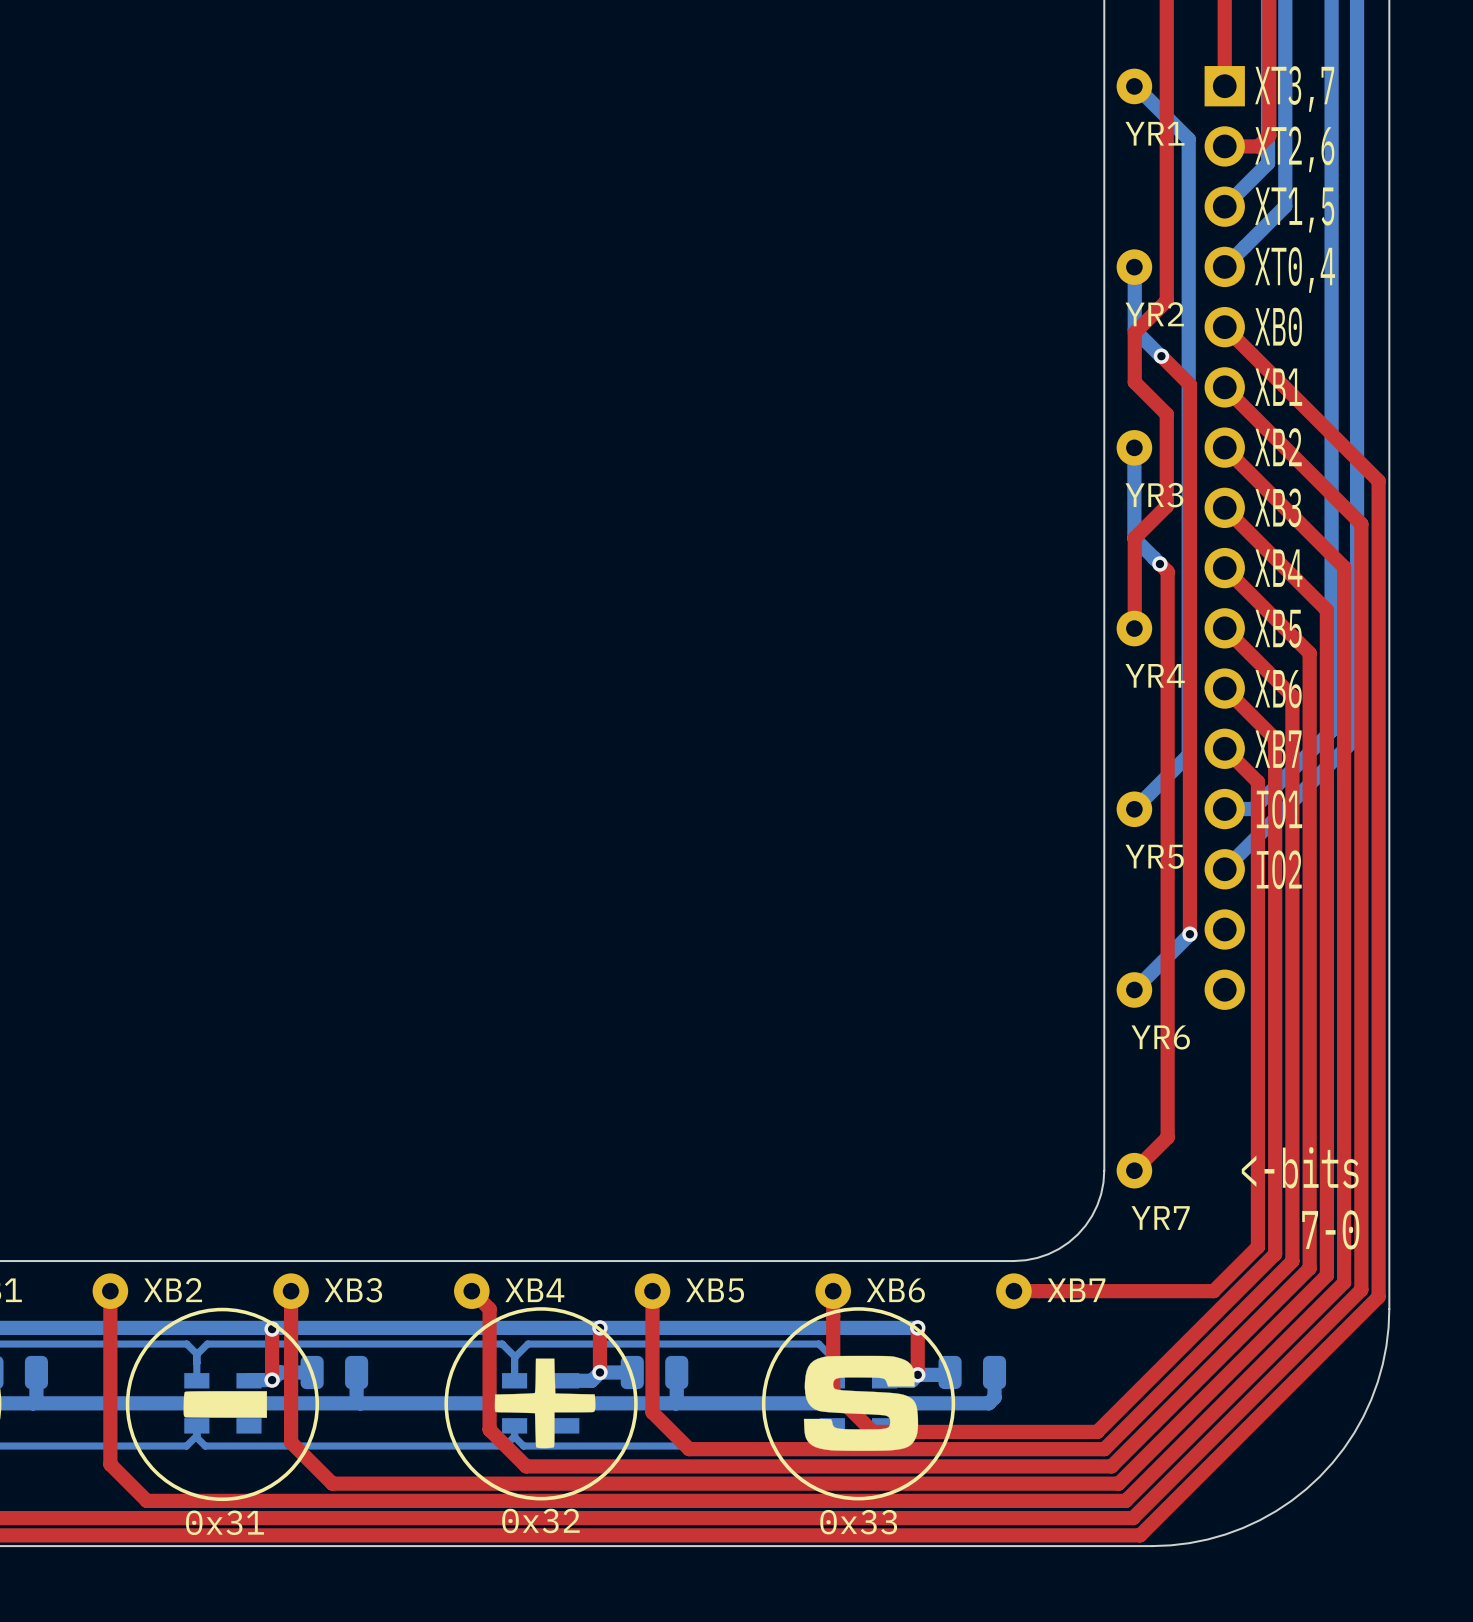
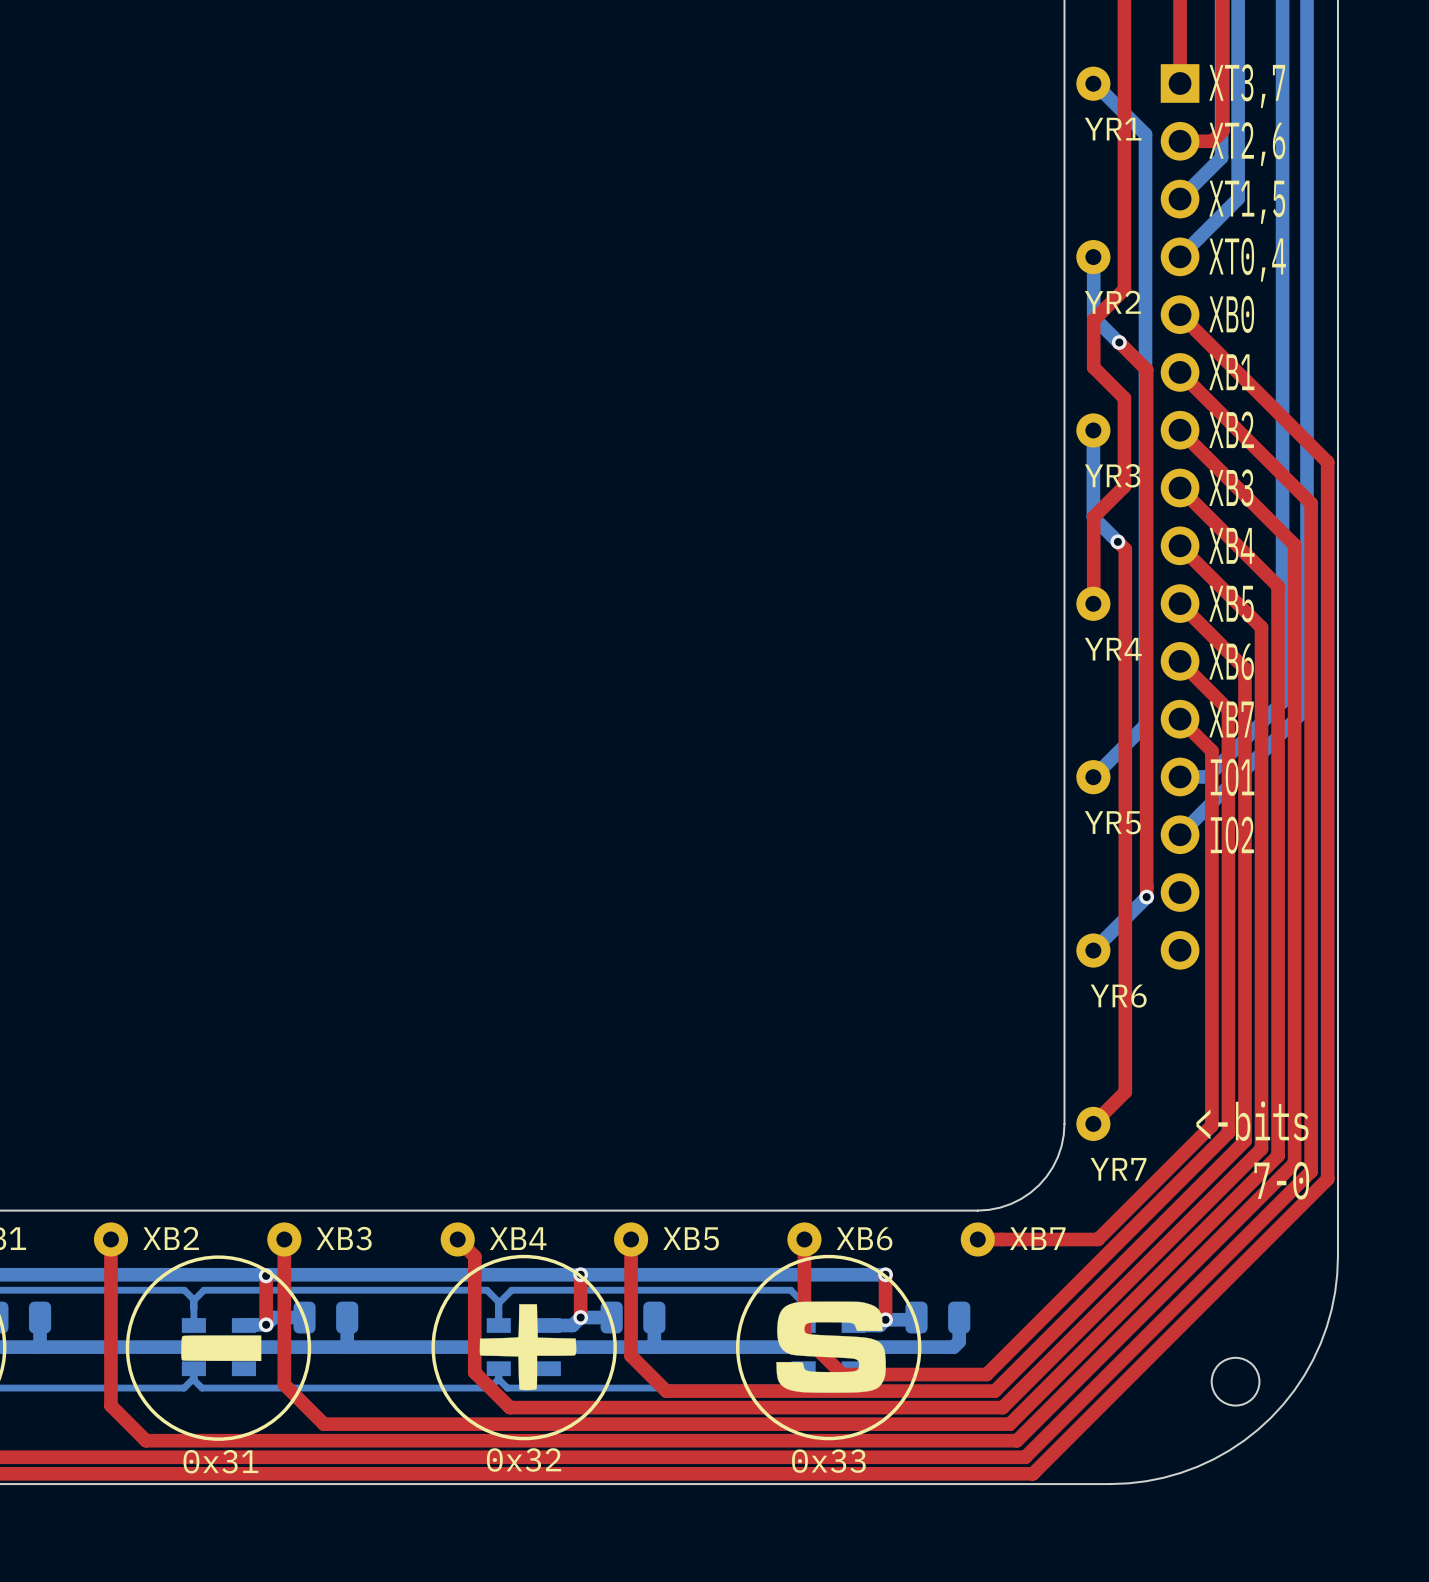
top track: (1257, 1172) (1257, 1246) (1213, 1291) (1139, 1291) -> (1211, 1125) (1098, 1239)
top track: (1275, 1179) (1275, 1254) (1097, 1431) (1023, 1431) -> (1228, 1132) (986, 1374)
top track: (1292, 1188) (1292, 1261) (1104, 1449) (1031, 1449) -> (1244, 1141) (994, 1391)
top track: (1309, 1196) (1309, 1268) (1111, 1466) (1039, 1466) -> (1261, 1148) (1002, 1407)
top track: (1326, 1204) (1326, 1275) (1118, 1483) (1047, 1483) -> (1278, 1155) (1009, 1424)
top track: (1344, 1211) (1344, 1282) (1125, 1500) (1054, 1500) -> (1294, 1163) (1016, 1440)
top track: (1361, 1220) (1361, 1289) (1132, 1518) (1063, 1518) -> (1311, 1171) (1025, 1457)
top track: (1378, 1228) (1378, 1296) (1140, 1535) (1071, 1535) -> (1327, 1179) (1033, 1473)
round board edge: none -> [1211, 1357, 1261, 1407]

